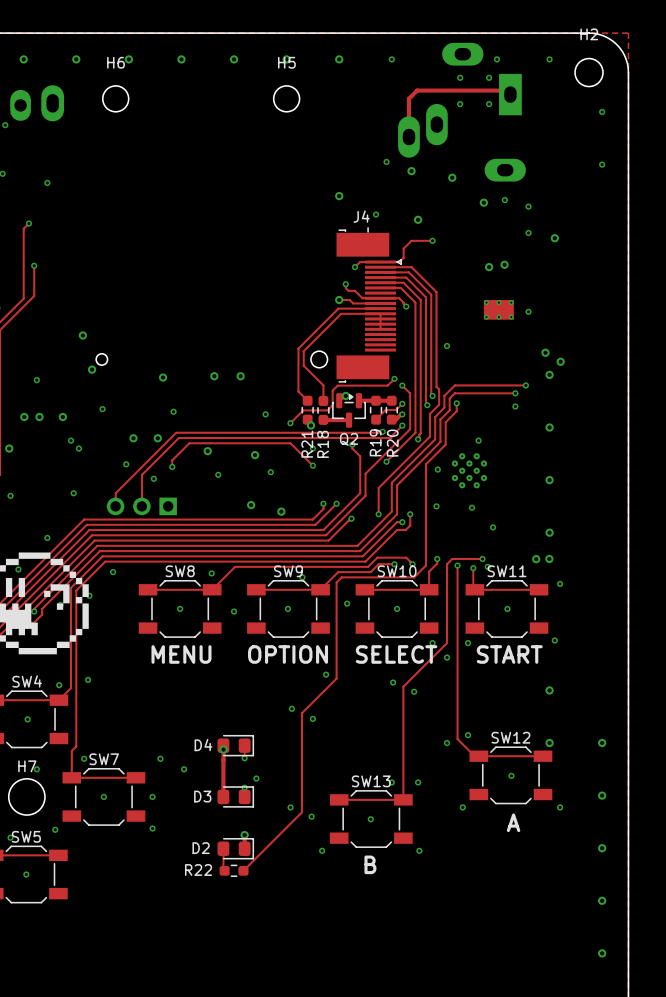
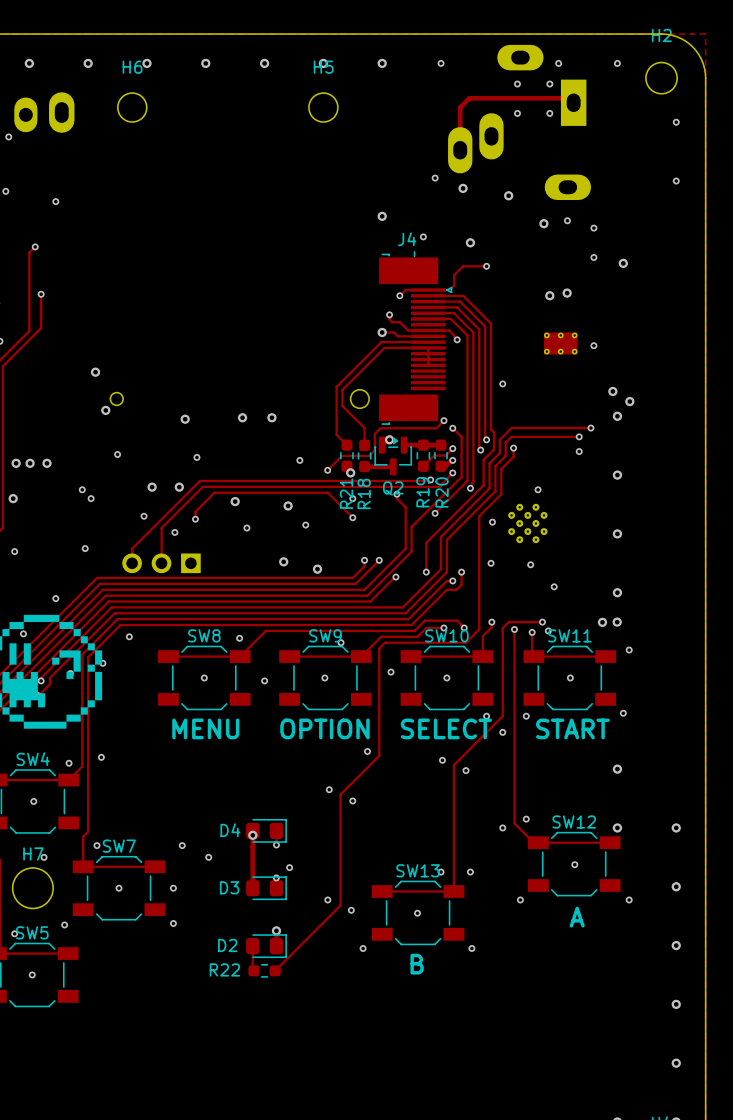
via: (36, 380) -> none
via position: (62, 416) -> (16, 463)

